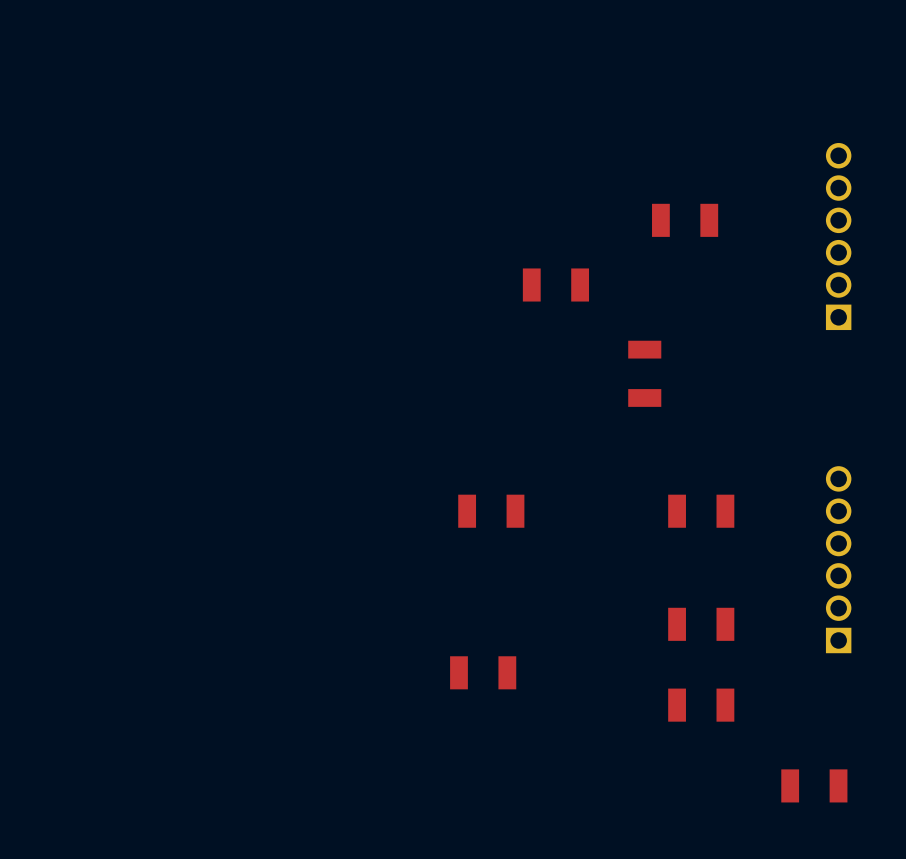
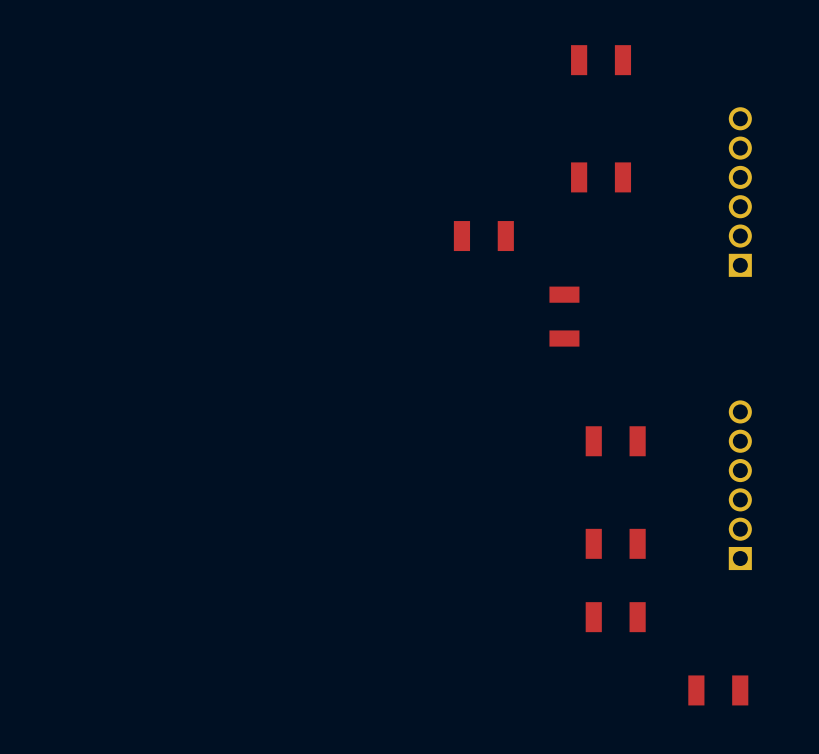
part: none -> (601, 60)
part: (491, 511) -> none
part: (483, 672) -> none

